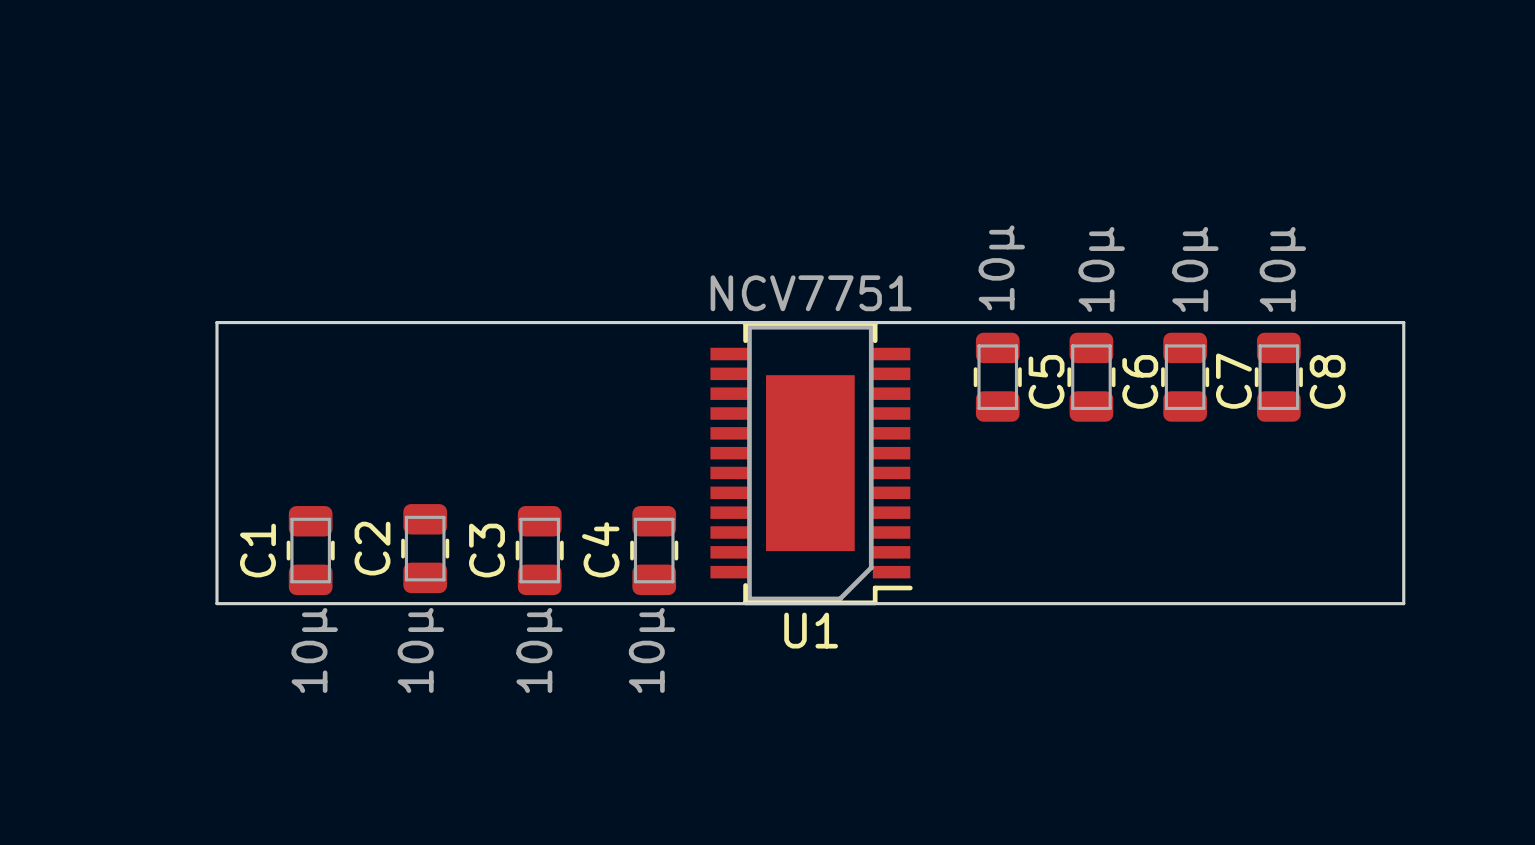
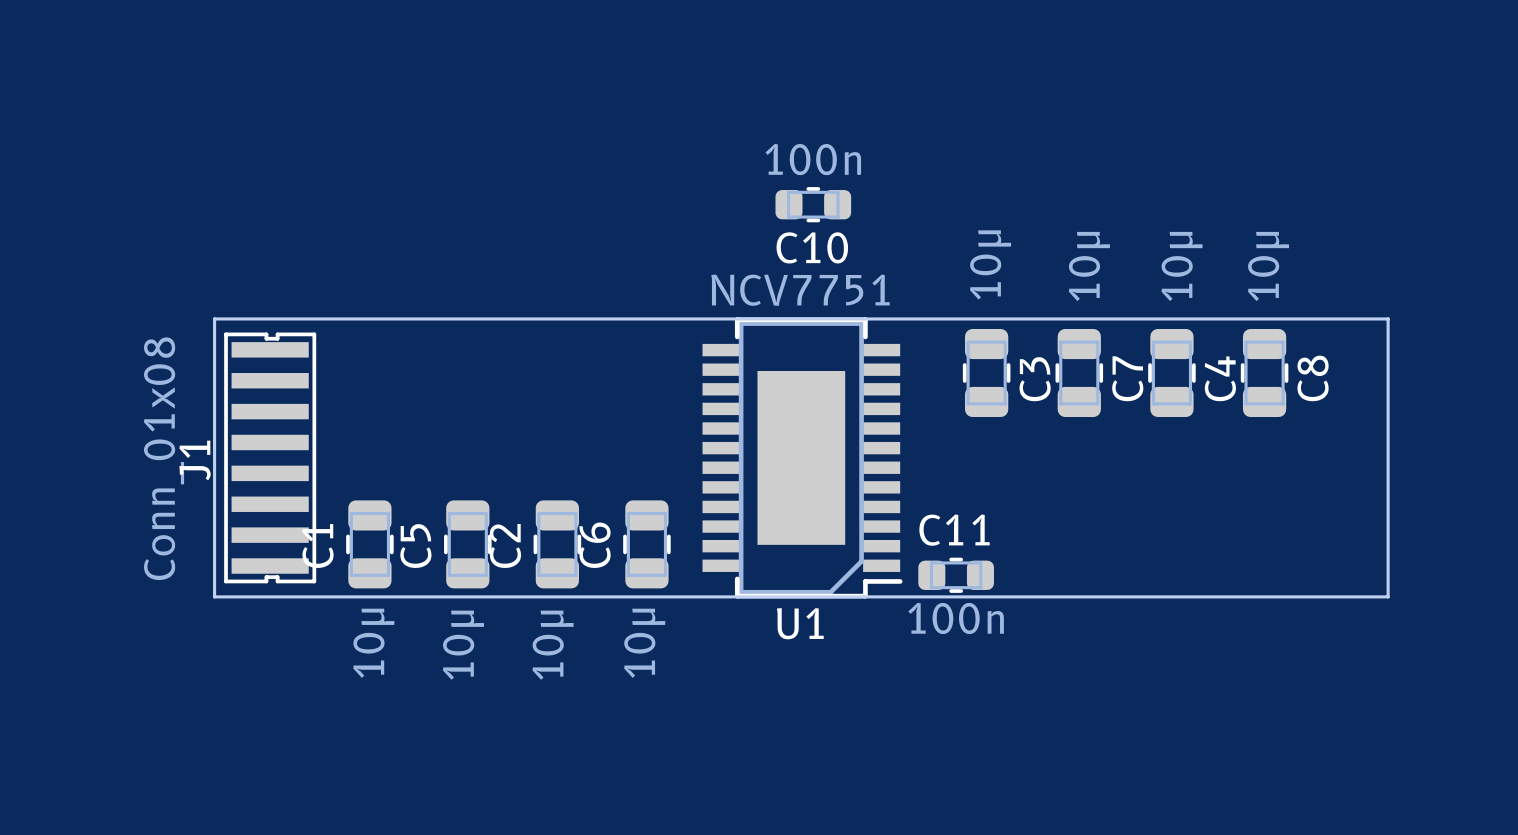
C10: none -> 100n (813, 204)
C5 name: C5 (1046, 381) -> C3 (1035, 379)
C6 name: C6 (1140, 381) -> C7 (1127, 378)
C7 name: C7 (1233, 381) -> C4 (1220, 378)
J1: none -> Conn_01x08 (270, 457)
C2 position: (425, 548) -> (557, 544)
C4 name: C4 (600, 549) -> C6 (595, 545)
C1 position: (310, 550) -> (369, 544)
C5: none -> 10μ (467, 544)
C3: 10μ (539, 550) -> none
C11: none -> 100n (956, 575)

